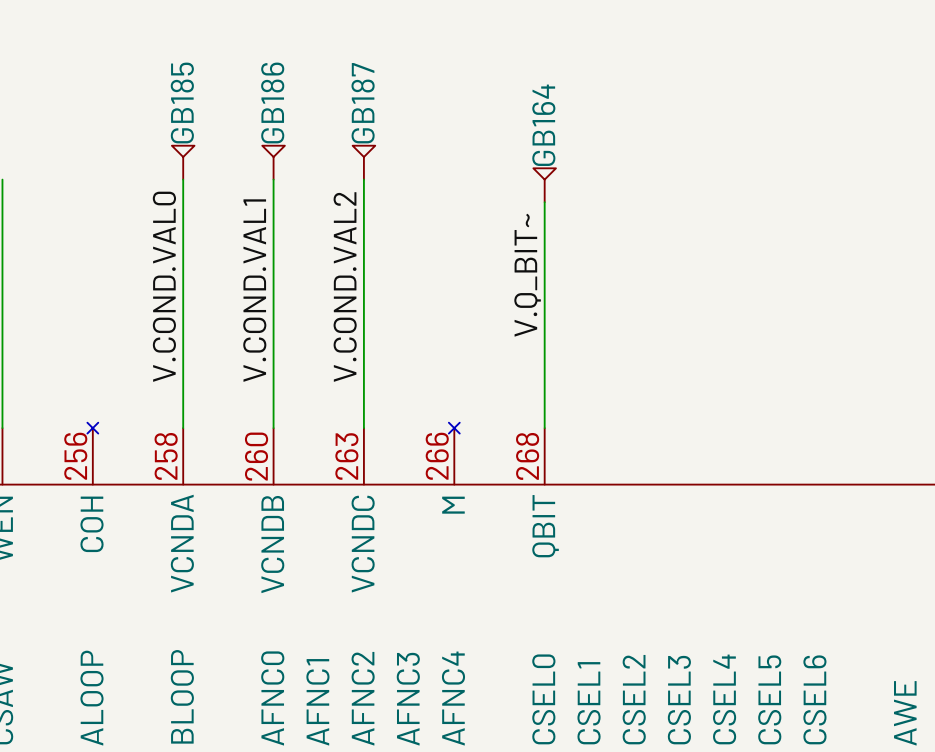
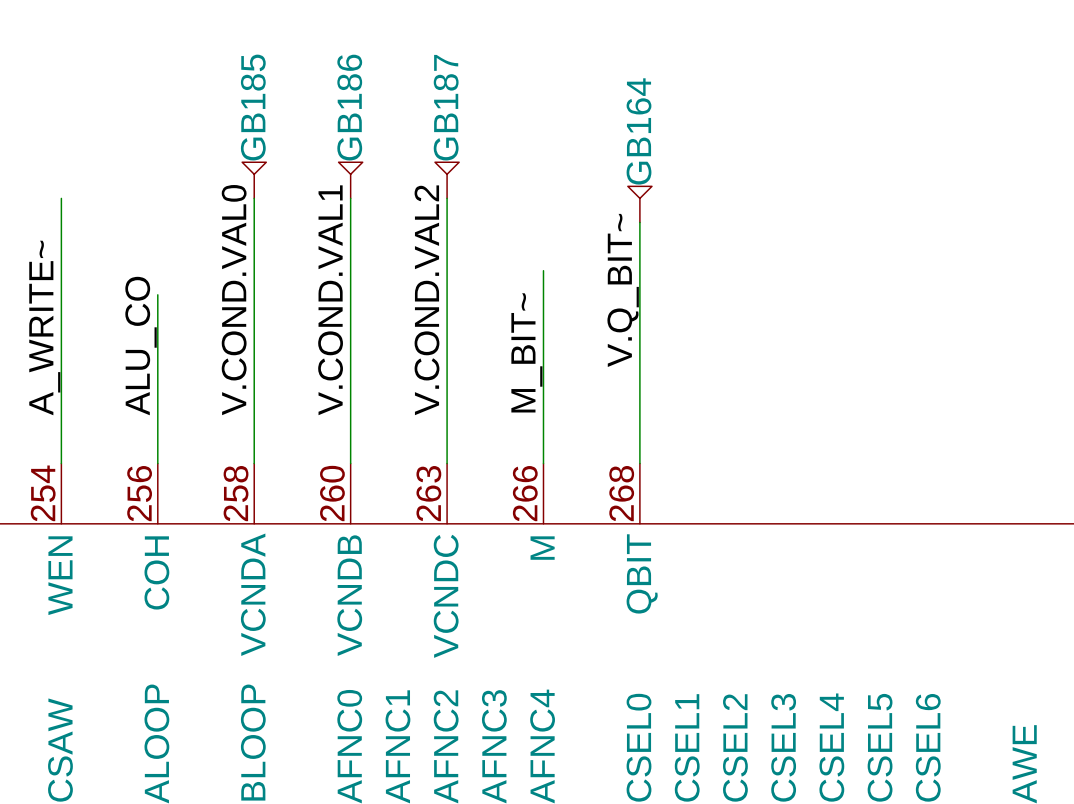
wire: none -> (543, 270) (543, 463)
wire: none -> (157, 294) (157, 463)
label: none -> ALU_CO (141, 346)
label: none -> M_BIT~ (526, 352)
no-connect mark: (92, 428) -> none
no-connect mark: (454, 428) -> none

